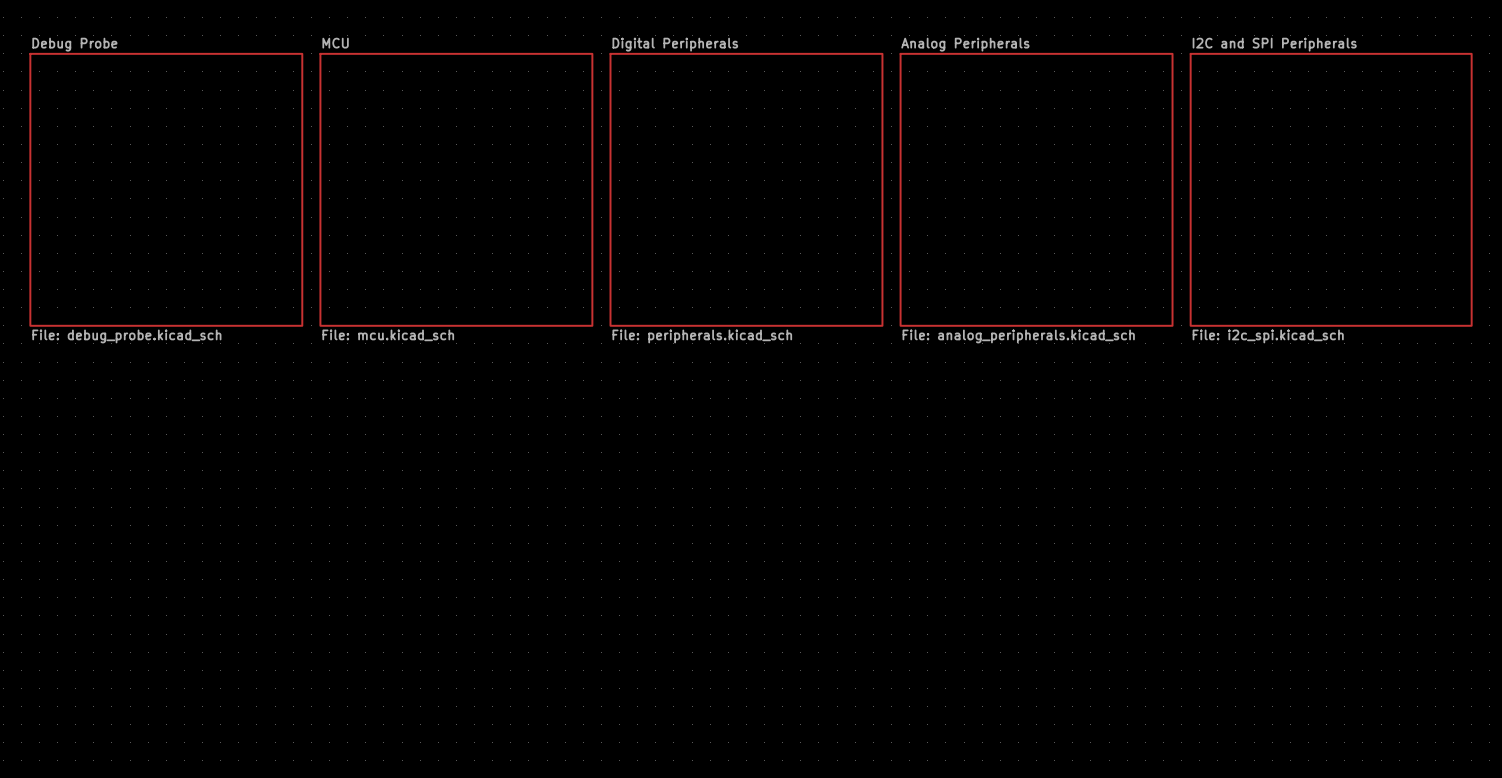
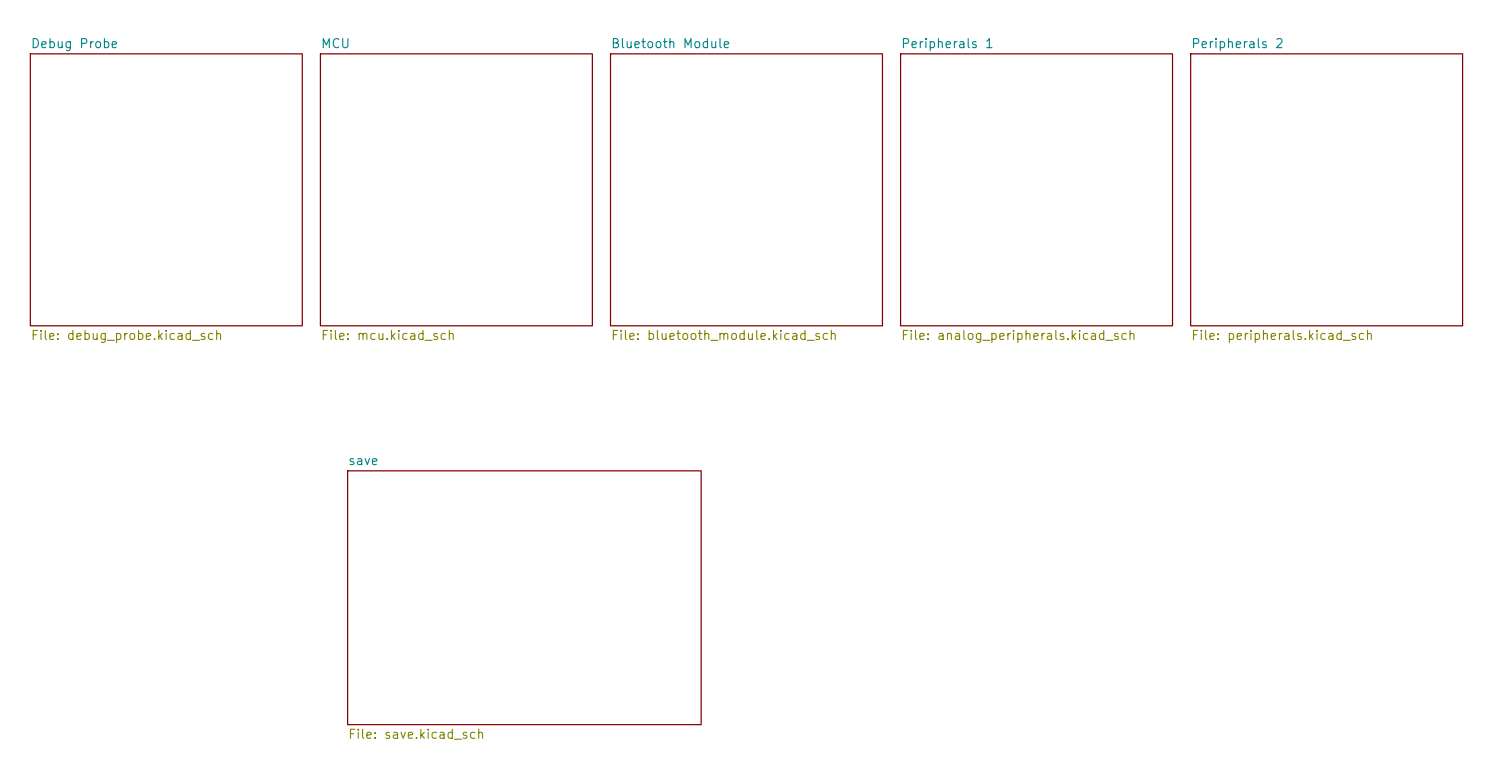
sheet Digital Peripherals name: Digital Peripherals (675, 44) -> Bluetooth Module (671, 43)
sheet Analog Peripherals name: Analog Peripherals (965, 44) -> Peripherals 1 (947, 44)
sheet Peripherals 2: none -> File: peripherals.kicad_sch (1326, 189)
sheet I2C and SPI Peripherals: File: i2c_spi.kicad_sch (1331, 189) -> none
sheet Digital Peripherals value: File: peripherals.kicad_sch (702, 336) -> File: bluetooth_module.kicad_sch (724, 335)
sheet save: none -> File: save.kicad_sch (524, 597)

